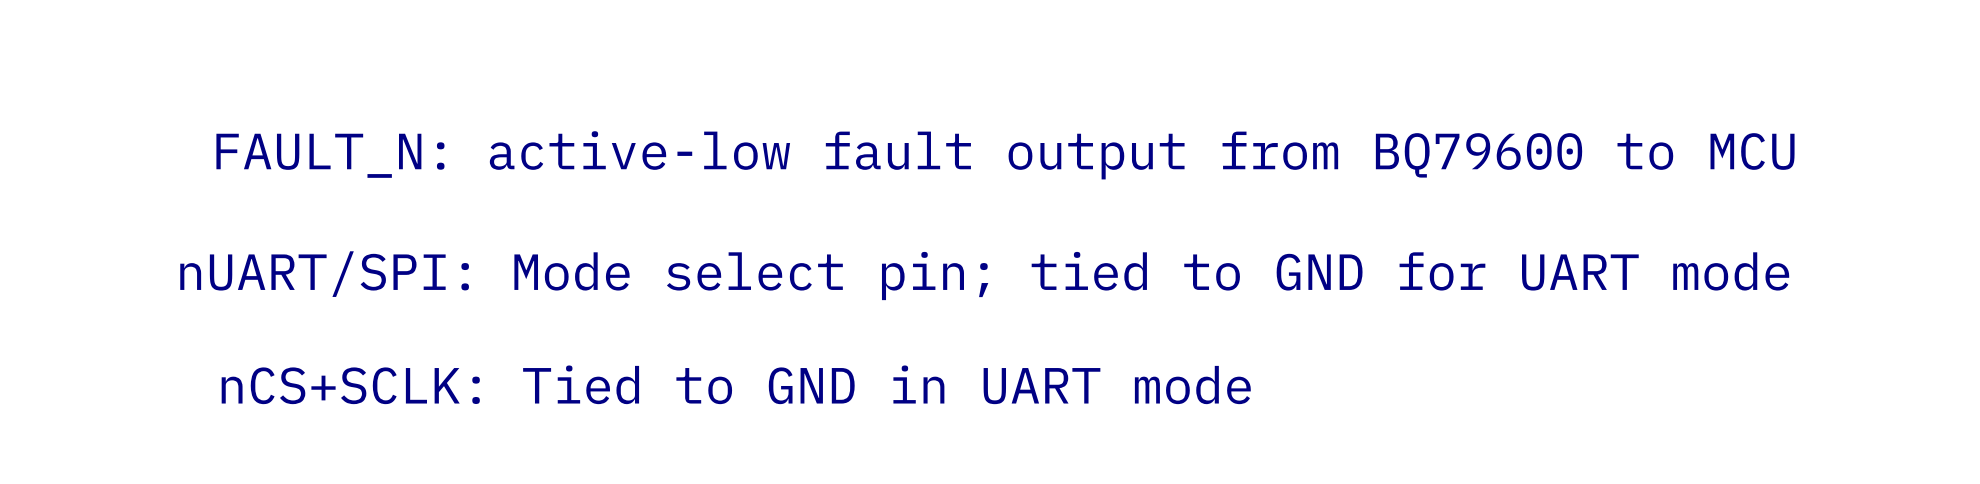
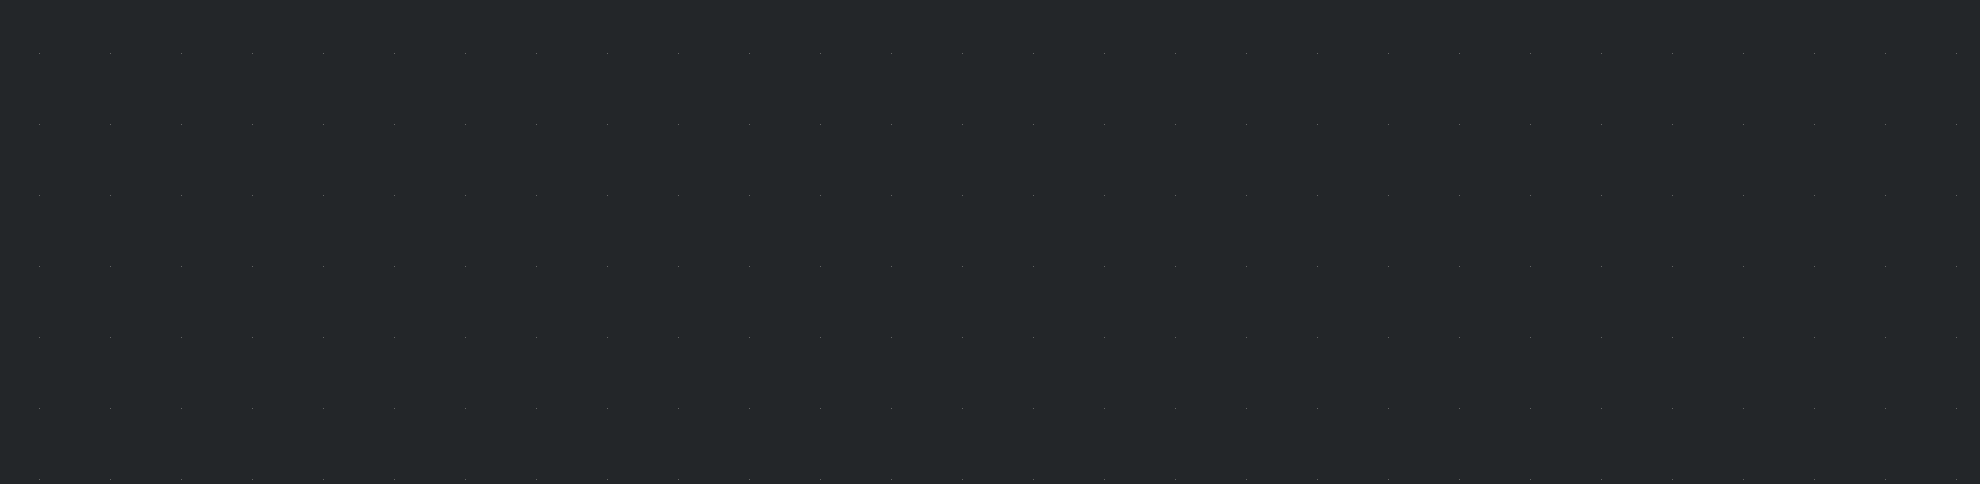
text: FAULT_N: active-low fault output from BQ79600 to MCU (1005, 155) -> none
text: nUART/SPI: Mode select pin; tied to GND for UART mode (984, 275) -> none
text: nCS+SCLK: Tied to GND in UART mode (736, 384) -> none

